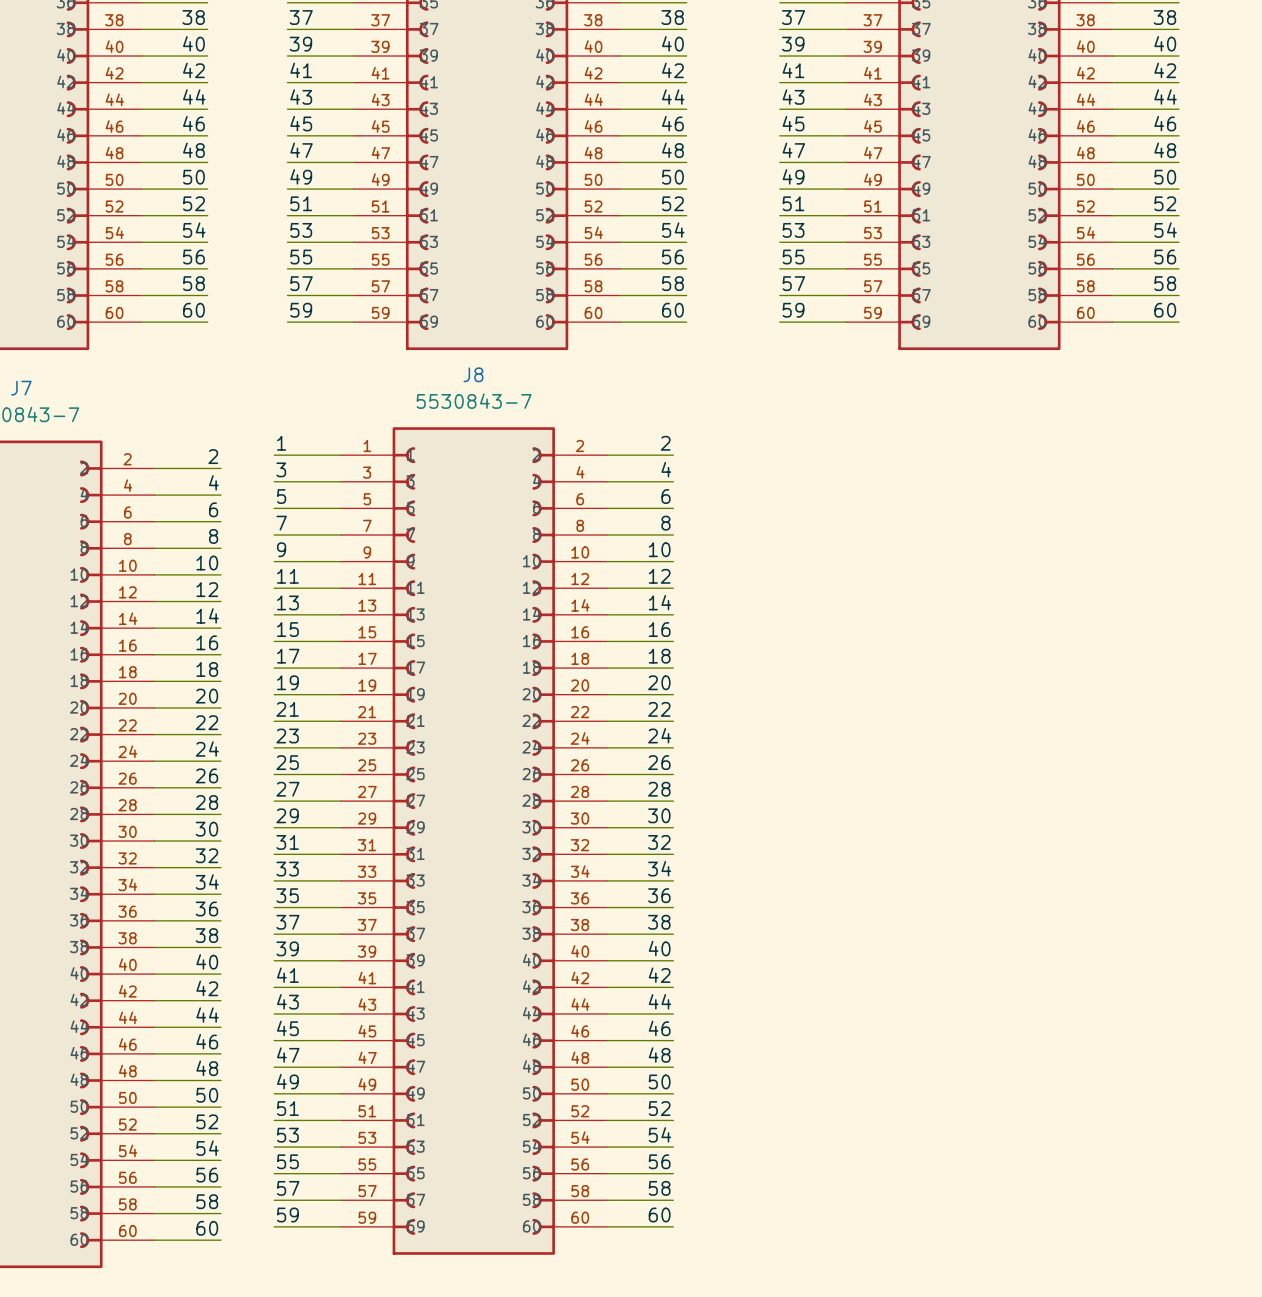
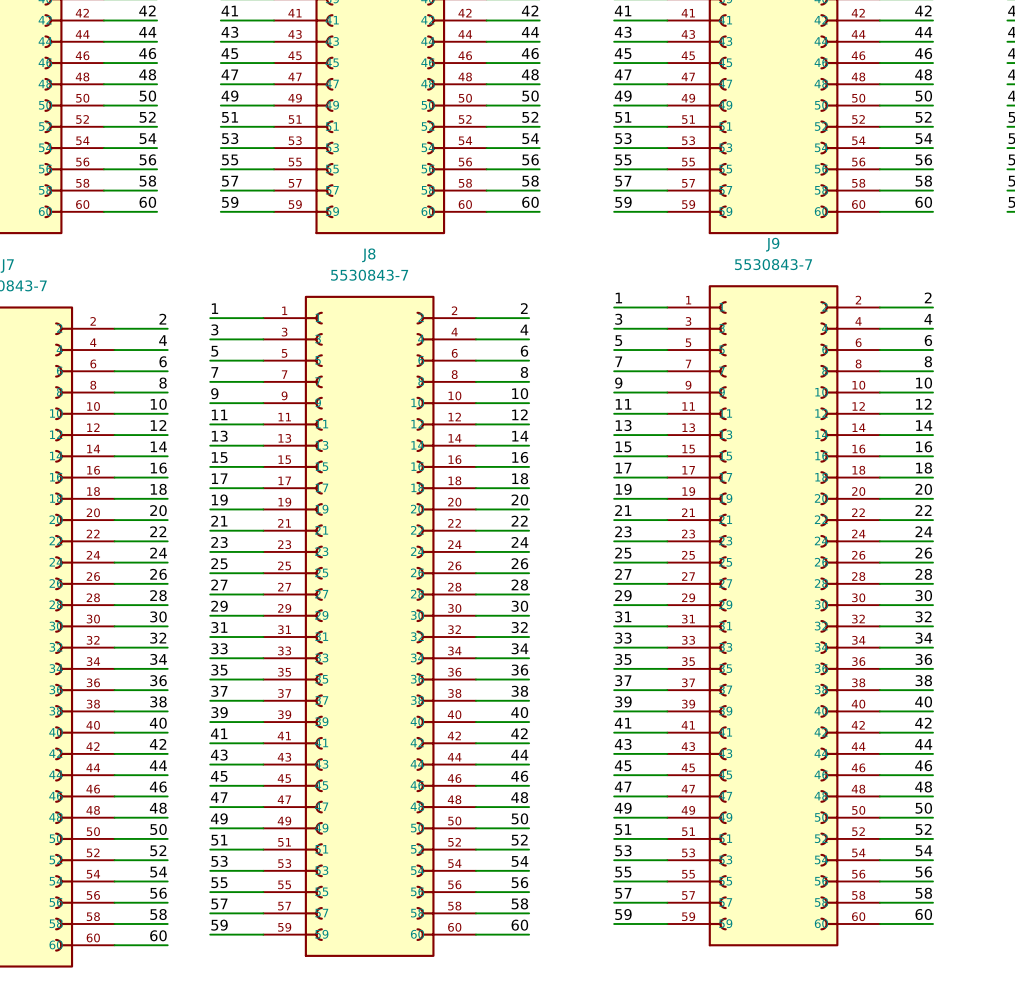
label: none -> 1 (618, 298)
label: none -> 2 (928, 297)
wire: none -> (614, 307) (667, 307)
wire: none -> (879, 307) (933, 307)
label: none -> 3 (618, 319)
label: none -> 4 (928, 319)
wire: none -> (614, 328) (667, 328)
wire: none -> (879, 328) (933, 328)
label: none -> 5 (618, 340)
label: none -> 6 (928, 340)
wire: none -> (614, 350) (667, 350)
wire: none -> (879, 350) (933, 350)
label: none -> 7 (618, 361)
label: none -> 8 (928, 361)
wire: none -> (614, 371) (667, 371)
wire: none -> (879, 371) (933, 371)
label: none -> 9 (618, 383)
label: none -> 10 (924, 383)
wire: none -> (614, 392) (667, 392)
wire: none -> (879, 392) (933, 392)
label: none -> 11 (623, 404)
label: none -> 12 (923, 404)
wire: none -> (614, 413) (667, 413)
wire: none -> (879, 413) (933, 413)
label: none -> 13 (623, 425)
label: none -> 14 (924, 425)
wire: none -> (614, 435) (667, 435)
wire: none -> (879, 435) (933, 435)
label: none -> 15 (623, 446)
label: none -> 16 (924, 446)
wire: none -> (614, 456) (667, 456)
wire: none -> (879, 456) (933, 456)
label: none -> 17 (623, 468)
label: none -> 18 (924, 468)
wire: none -> (614, 477) (667, 477)
wire: none -> (879, 477) (933, 477)
label: none -> 19 (623, 489)
label: none -> 20 (923, 489)
wire: none -> (614, 498) (667, 498)
wire: none -> (879, 498) (933, 498)
label: none -> 21 (623, 510)
label: none -> 22 (923, 510)
wire: none -> (614, 520) (667, 520)
wire: none -> (879, 520) (933, 520)
label: none -> 23 (623, 531)
label: none -> 24 (923, 531)
wire: none -> (614, 541) (667, 541)
wire: none -> (879, 541) (933, 541)
label: none -> 25 (623, 553)
label: none -> 26 (923, 553)
wire: none -> (614, 562) (667, 562)
wire: none -> (879, 562) (933, 562)
label: none -> 27 (623, 574)
label: none -> 28 (923, 574)
wire: none -> (614, 583) (667, 583)
wire: none -> (879, 583) (933, 583)
label: none -> 29 (623, 595)
label: none -> 30 (923, 595)
wire: none -> (614, 605) (667, 605)
wire: none -> (879, 605) (933, 605)
J9: none -> 5530843-7 (773, 615)
label: none -> 31 (623, 616)
label: none -> 32 (923, 616)
wire: none -> (614, 626) (667, 626)
wire: none -> (879, 626) (933, 626)
label: none -> 33 (623, 638)
label: none -> 34 (923, 638)
wire: none -> (614, 647) (667, 647)
wire: none -> (879, 647) (933, 647)
label: none -> 35 (623, 659)
label: none -> 36 (923, 659)
wire: none -> (614, 668) (667, 668)
wire: none -> (879, 668) (933, 668)
label: none -> 37 (623, 680)
label: none -> 38 (923, 680)
wire: none -> (614, 690) (667, 690)
wire: none -> (879, 690) (933, 690)
label: none -> 39 (623, 701)
label: none -> 40 (923, 701)
wire: none -> (614, 711) (667, 711)
wire: none -> (879, 711) (933, 711)
label: none -> 41 (623, 723)
label: none -> 42 (923, 723)
wire: none -> (614, 732) (667, 732)
wire: none -> (879, 732) (933, 732)
label: none -> 43 (623, 744)
label: none -> 44 (923, 744)
wire: none -> (614, 753) (667, 753)
wire: none -> (879, 753) (933, 753)
label: none -> 45 (623, 765)
label: none -> 46 (923, 765)
wire: none -> (614, 775) (667, 775)
wire: none -> (879, 775) (933, 775)
label: none -> 47 (623, 786)
label: none -> 48 (923, 786)
wire: none -> (614, 796) (667, 796)
wire: none -> (879, 796) (933, 796)
label: none -> 49 (623, 808)
label: none -> 50 (923, 808)
wire: none -> (614, 817) (667, 817)
wire: none -> (879, 817) (933, 817)
label: none -> 51 (623, 829)
label: none -> 52 (923, 829)
wire: none -> (614, 838) (667, 838)
wire: none -> (879, 838) (933, 838)
label: none -> 53 (623, 850)
label: none -> 54 (923, 850)
wire: none -> (614, 860) (667, 860)
wire: none -> (879, 860) (933, 860)
label: none -> 55 (623, 872)
label: none -> 56 (923, 872)
wire: none -> (614, 881) (667, 881)
wire: none -> (879, 881) (933, 881)
label: none -> 57 (623, 893)
label: none -> 58 (923, 893)
wire: none -> (614, 902) (667, 902)
wire: none -> (879, 902) (933, 902)
label: none -> 59 (623, 914)
label: none -> 60 (923, 914)
wire: none -> (614, 923) (667, 923)
wire: none -> (879, 923) (933, 923)

